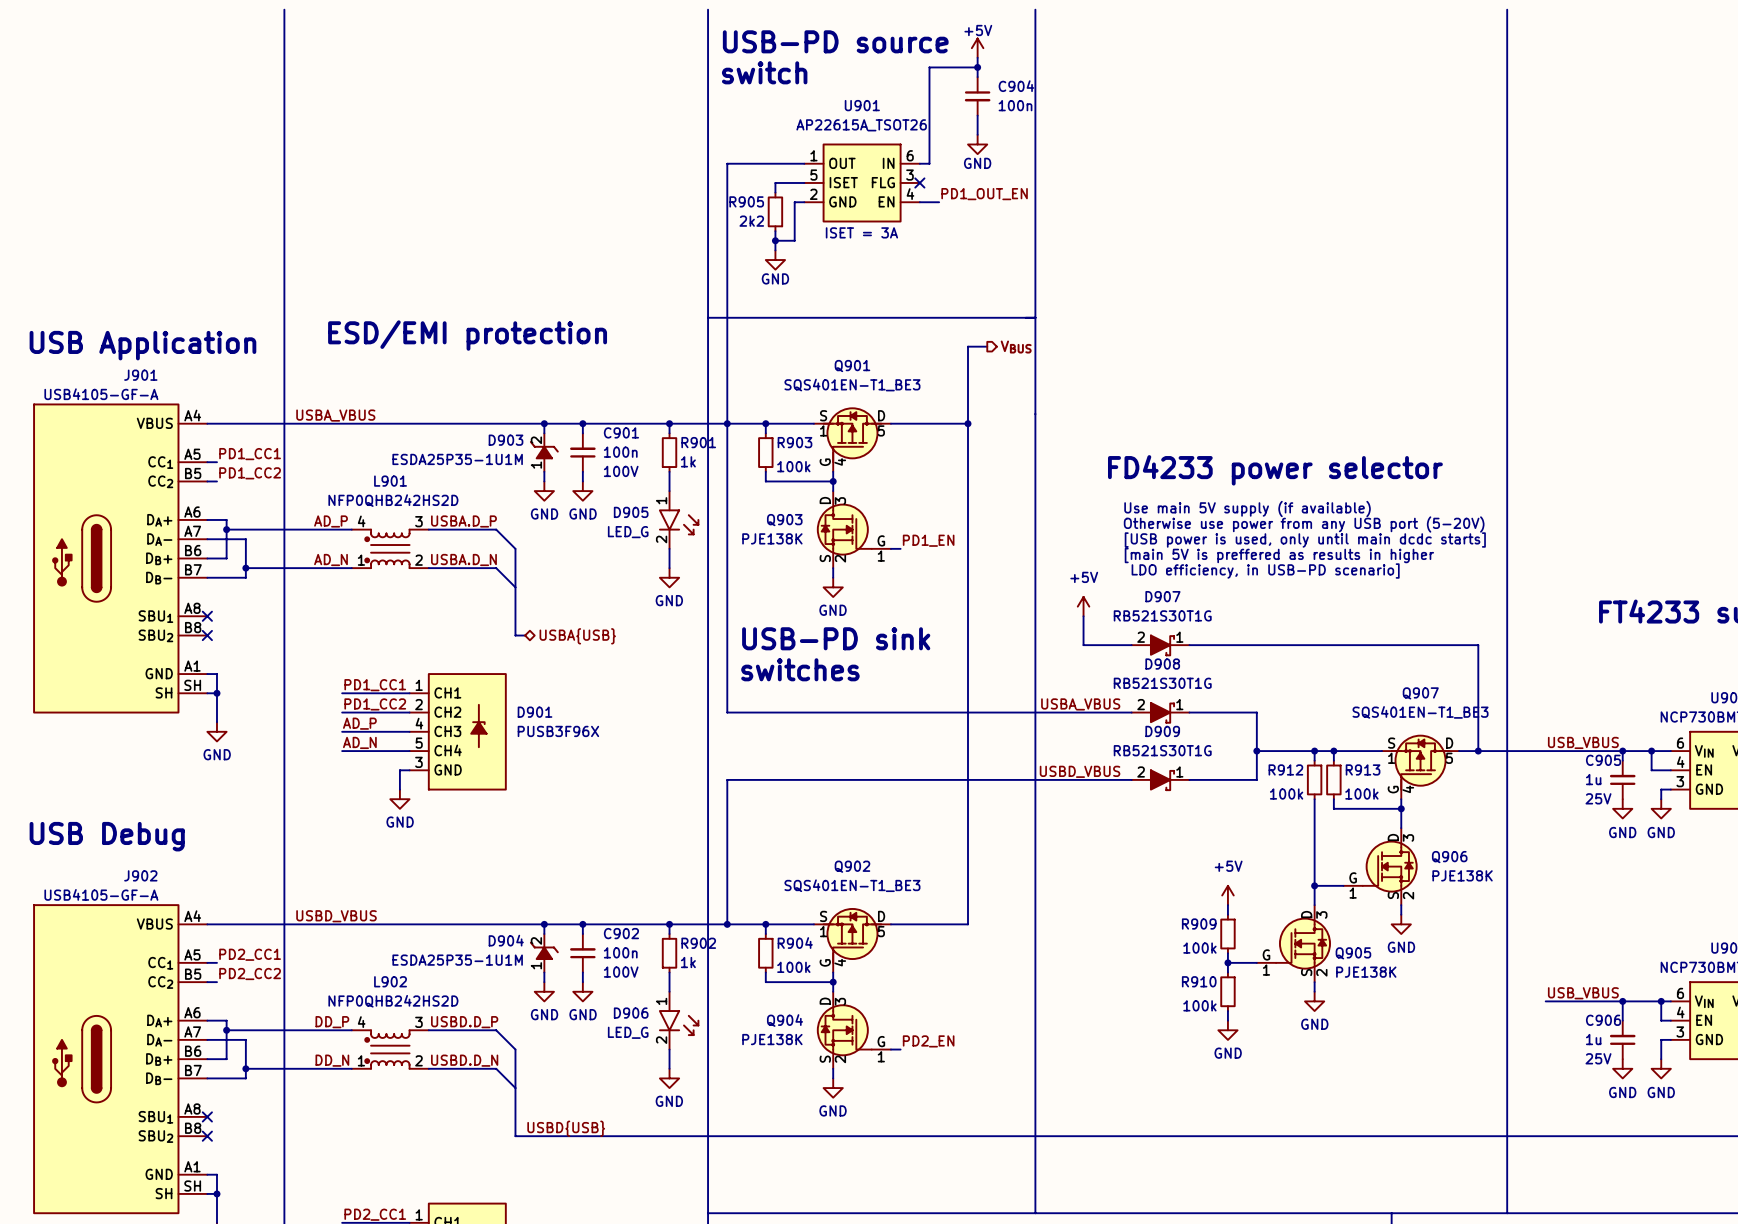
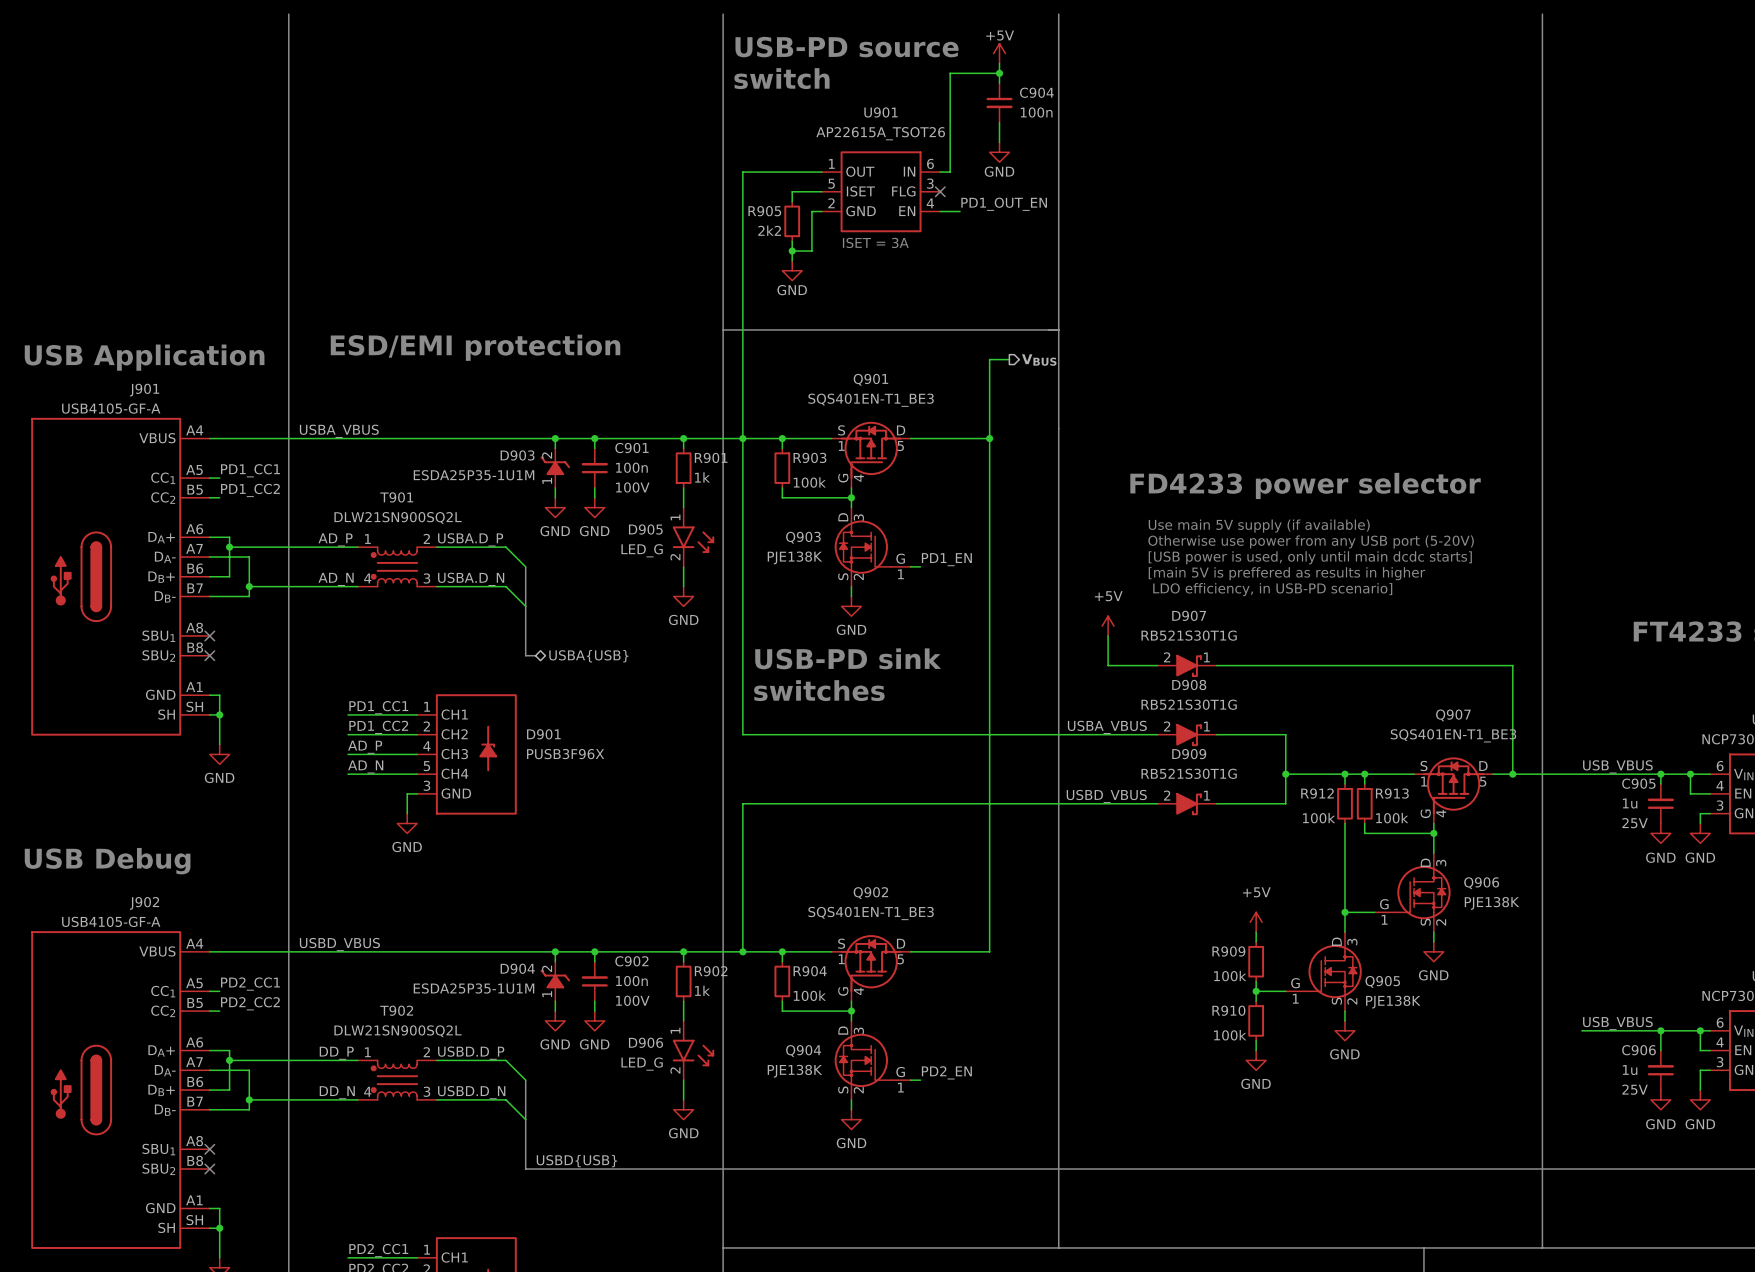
L901: (390, 548) -> none
T901: none -> (397, 566)
L902: (390, 1049) -> none
T902: none -> (397, 1080)

